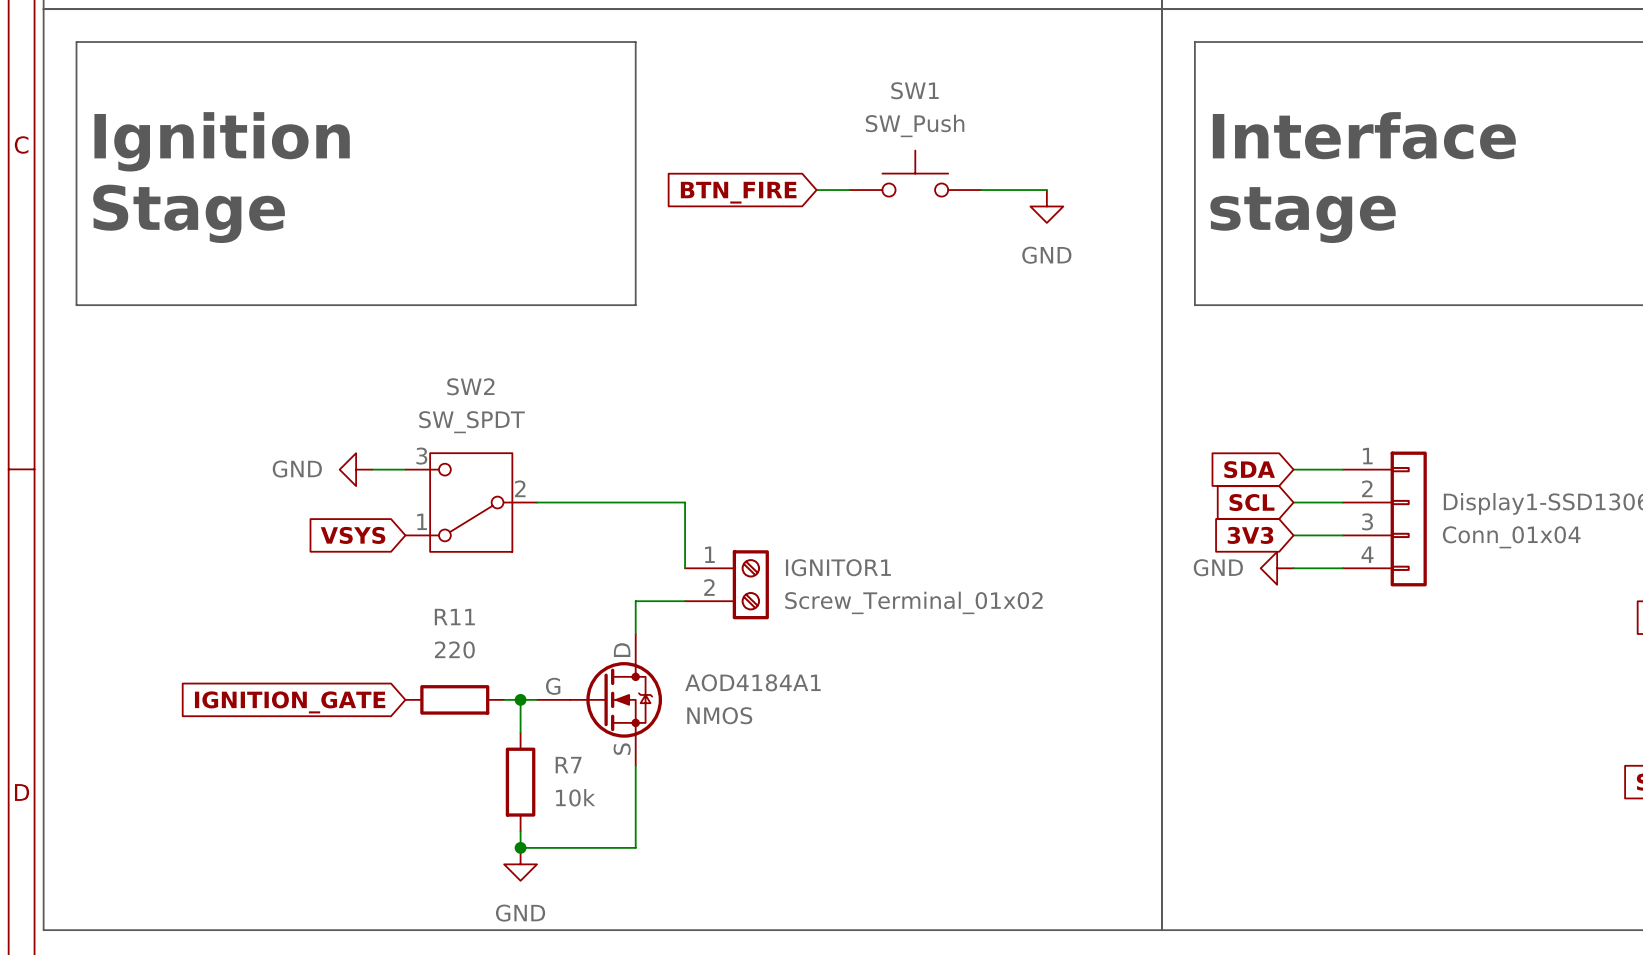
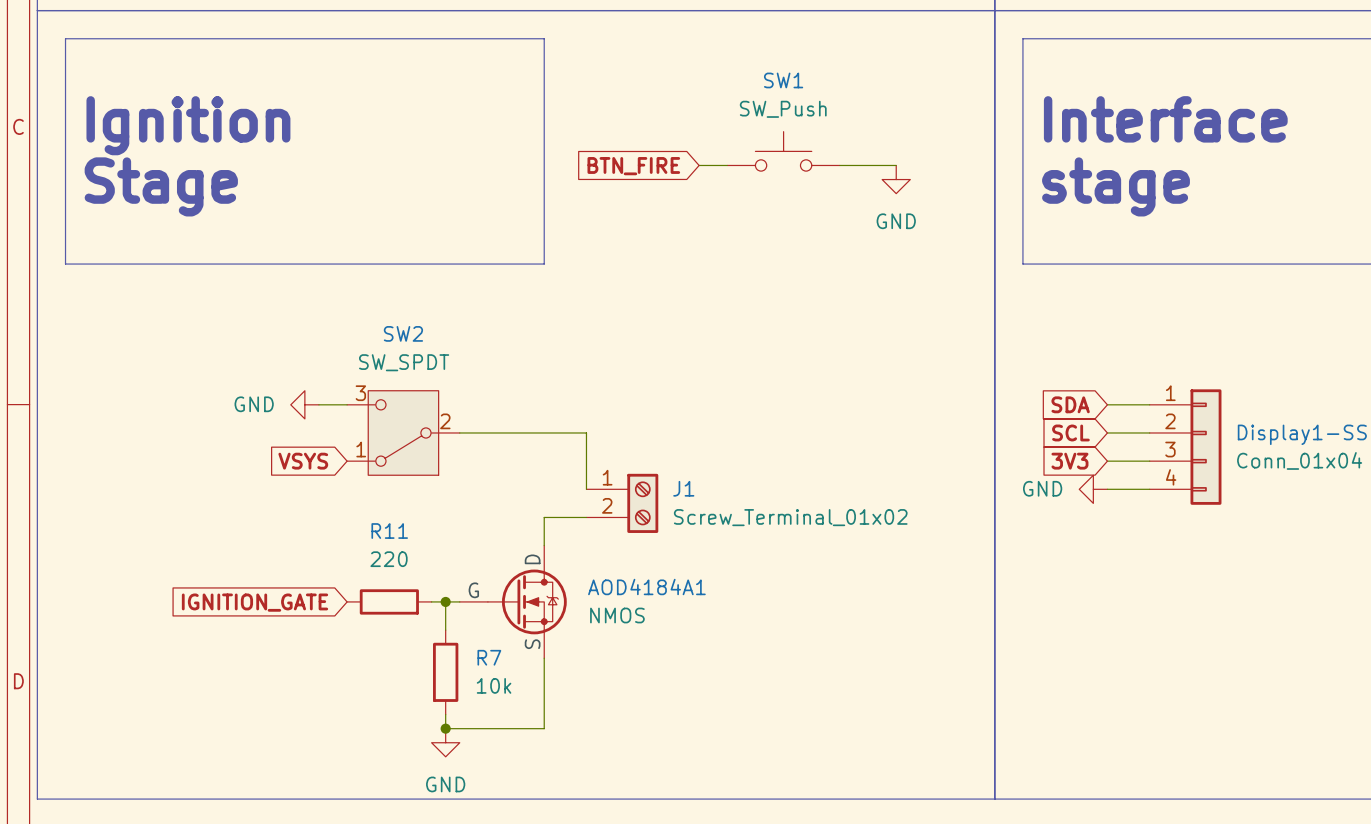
IGNITOR1 name: IGNITOR1 (838, 567) -> J1 (683, 488)

